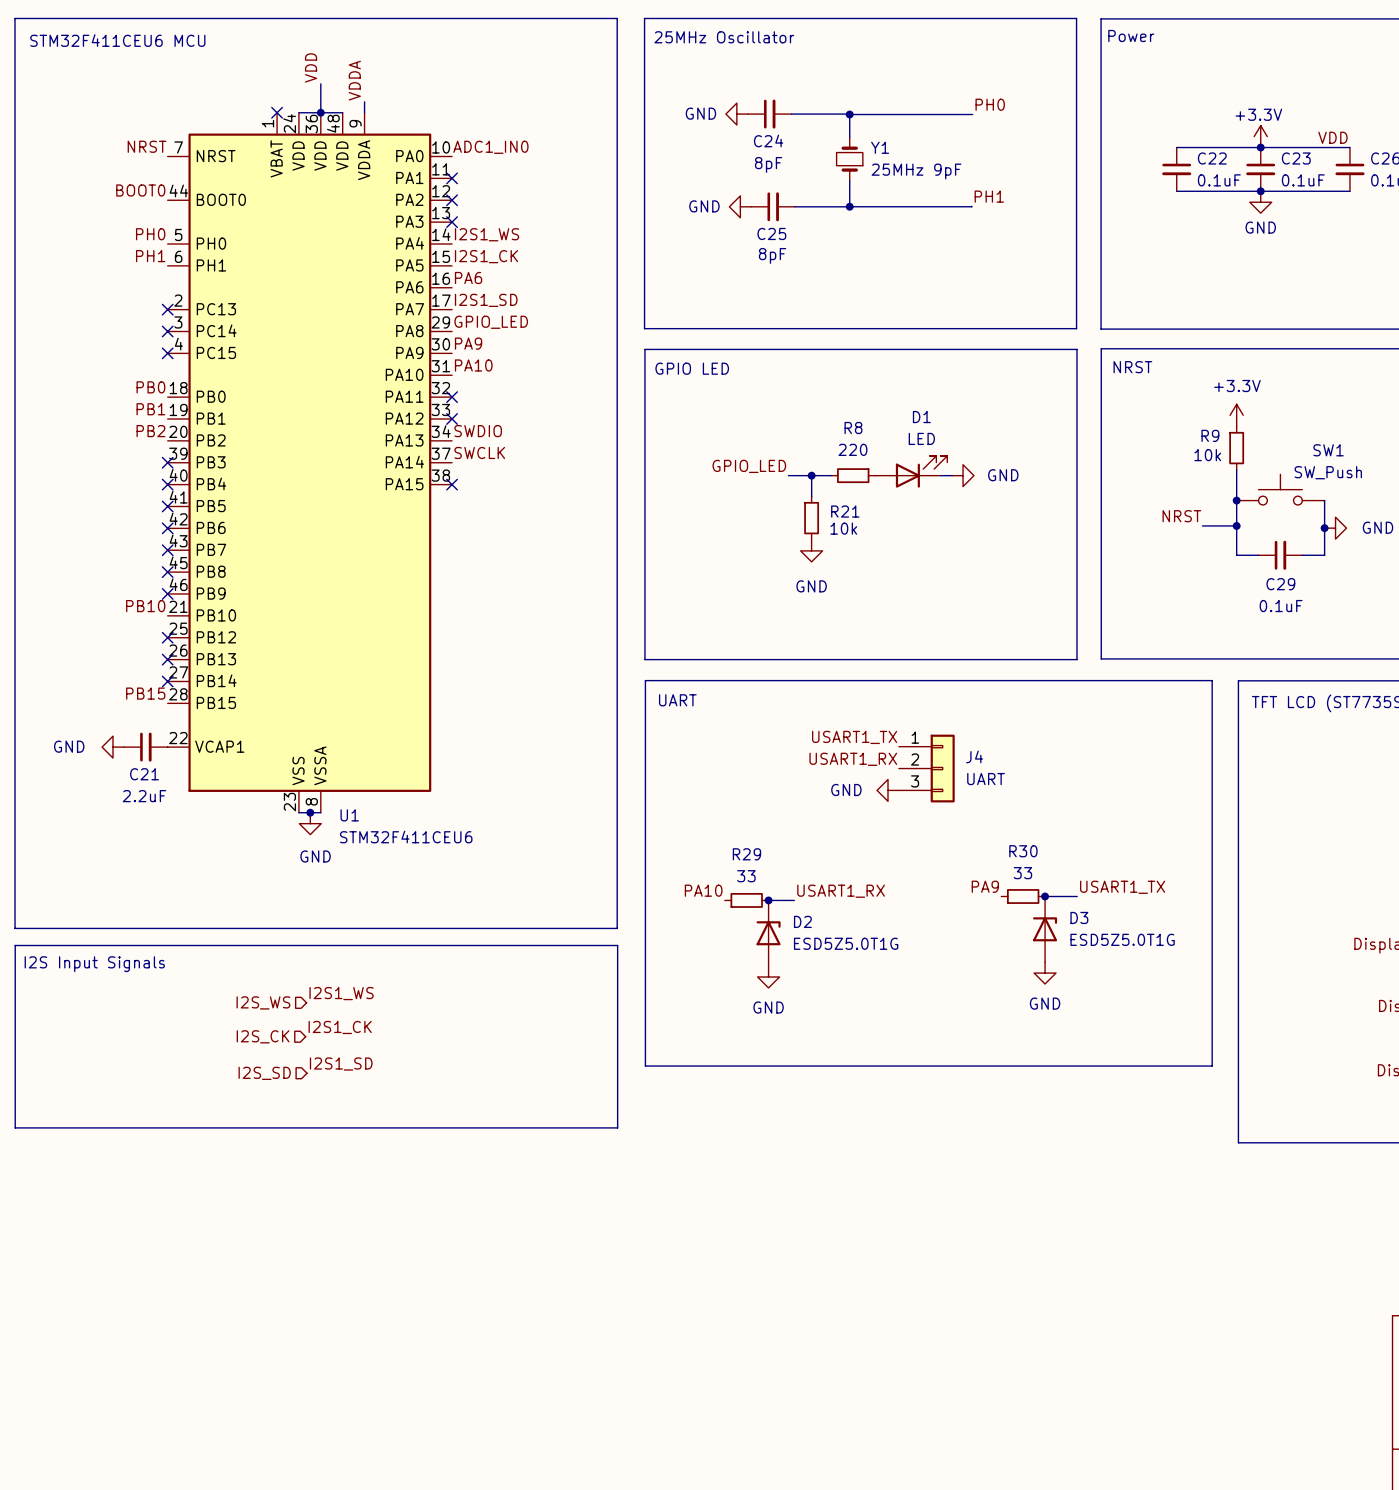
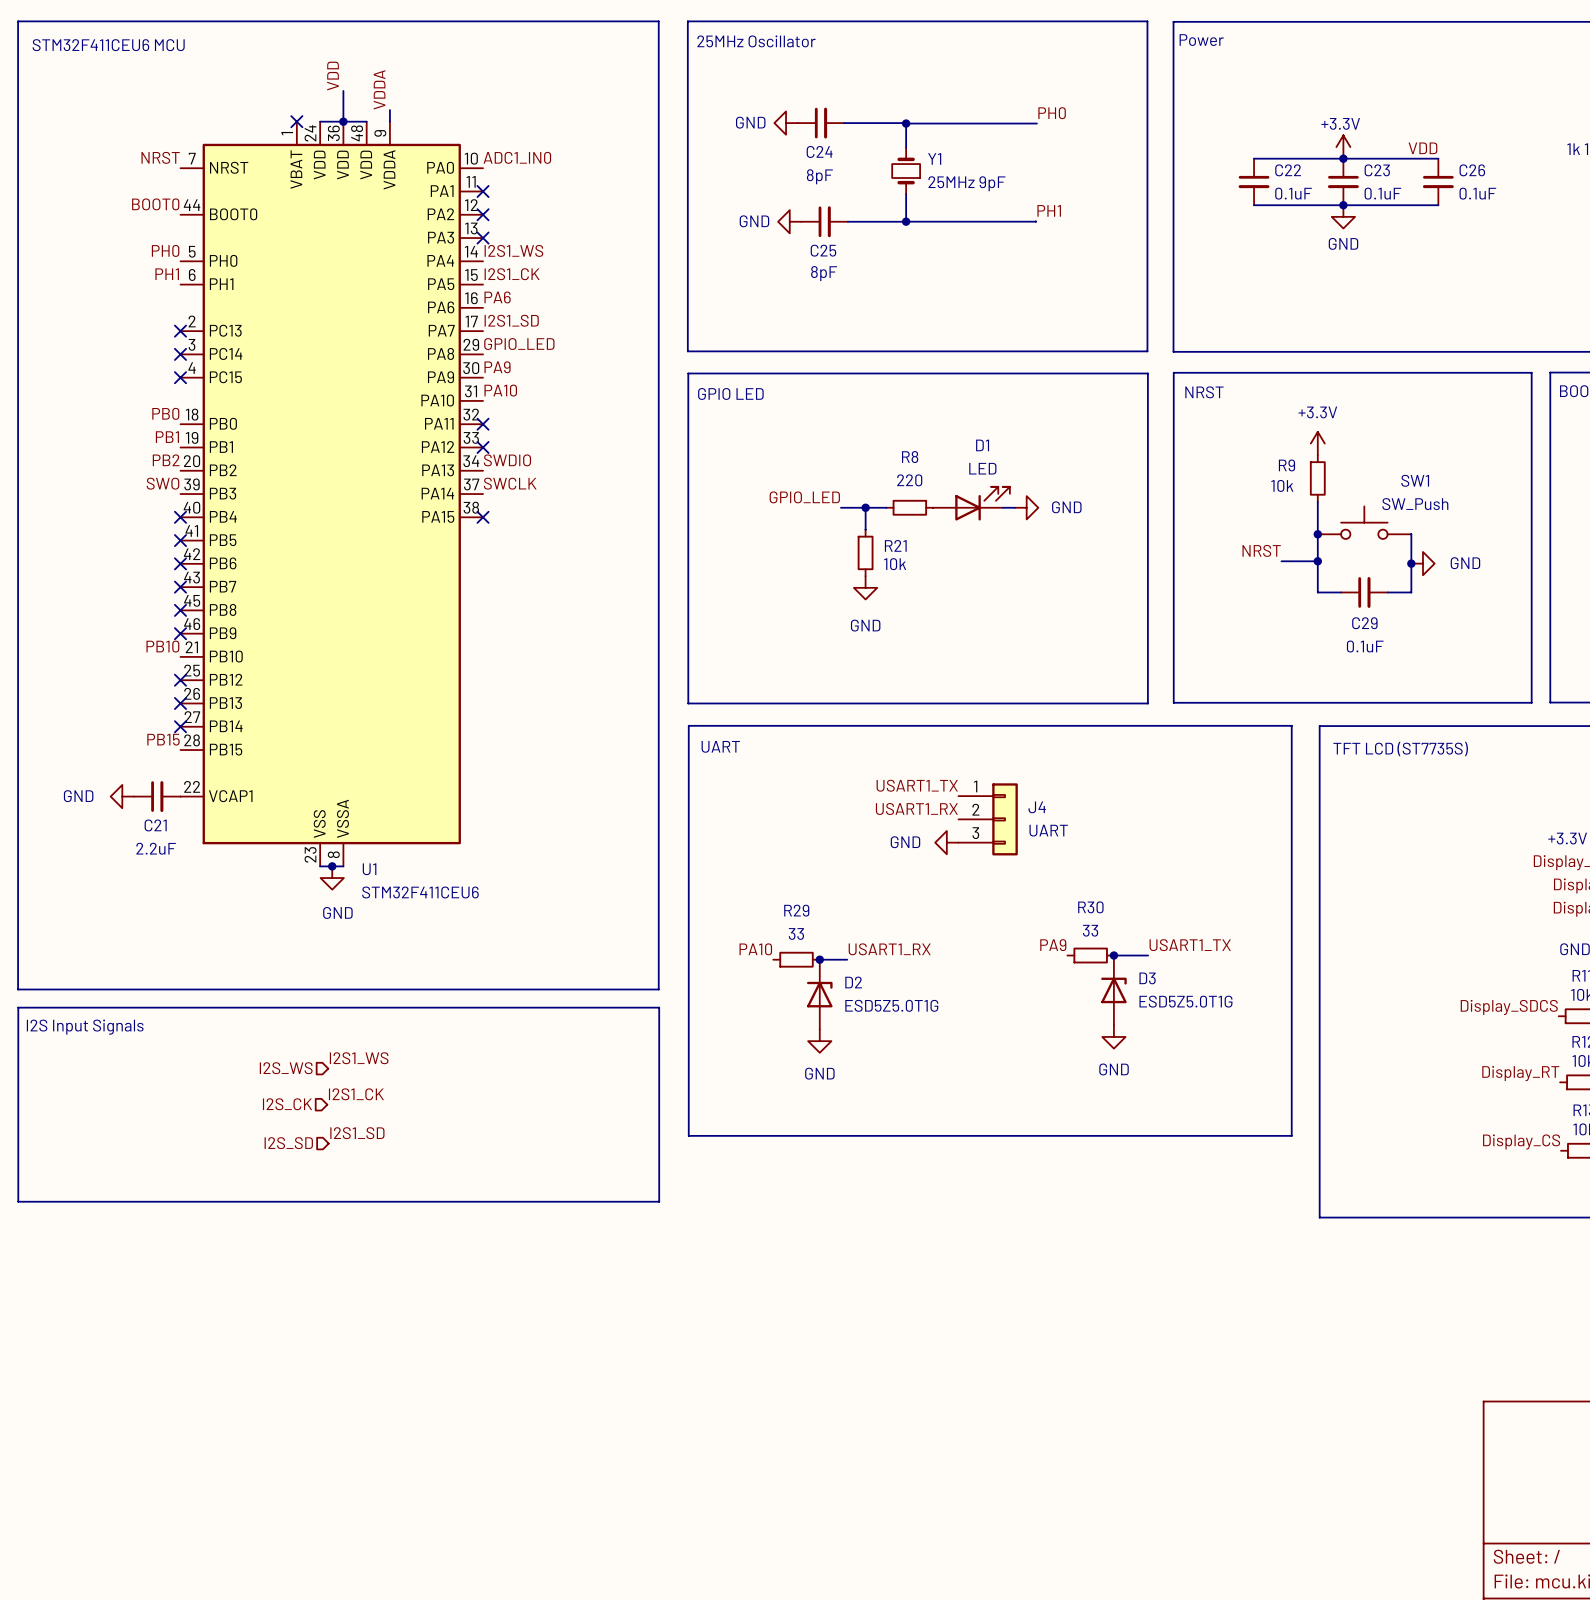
label: none -> SWO (163, 483)
no-connect mark: (167, 462) -> none

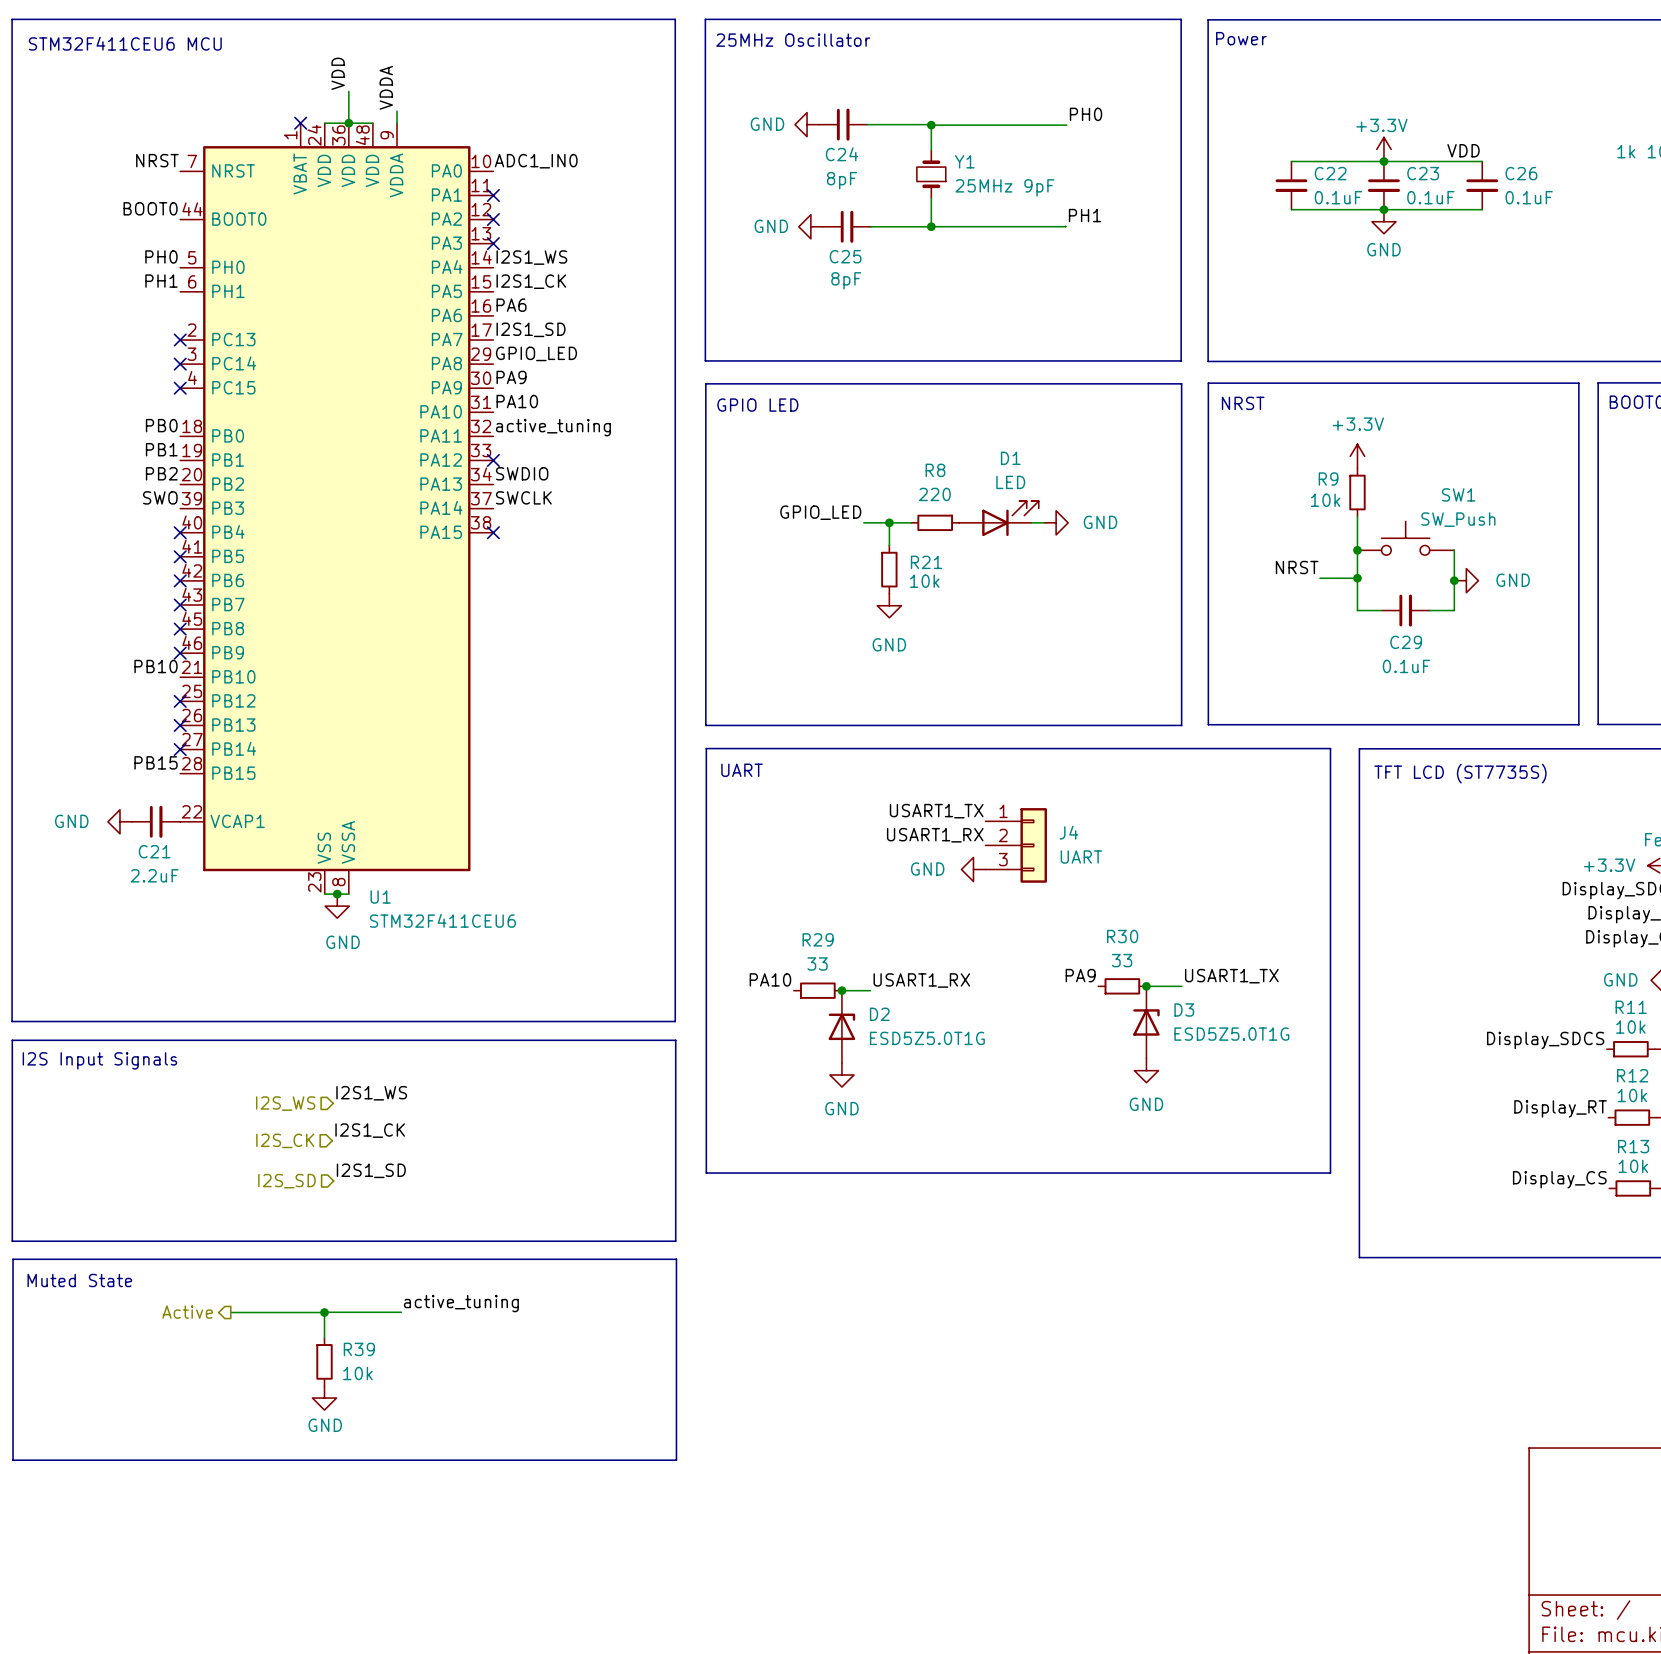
label: none -> active_tuning (553, 427)
no-connect mark: (483, 424) -> none
line: none -> (13, 1259) (676, 1259) (676, 1460) (13, 1460) (13, 1259)
text: none -> Muted State (79, 1280)
label: none -> active_tuning (461, 1303)
hierarchical label: none -> Active (187, 1312)
wire: none -> (230, 1312) (324, 1312)
junction: none -> (324, 1312)
wire: none -> (401, 1312) (324, 1312) (324, 1337)
R39: none -> 10k (324, 1361)
power symbol: none -> GND (324, 1398)

